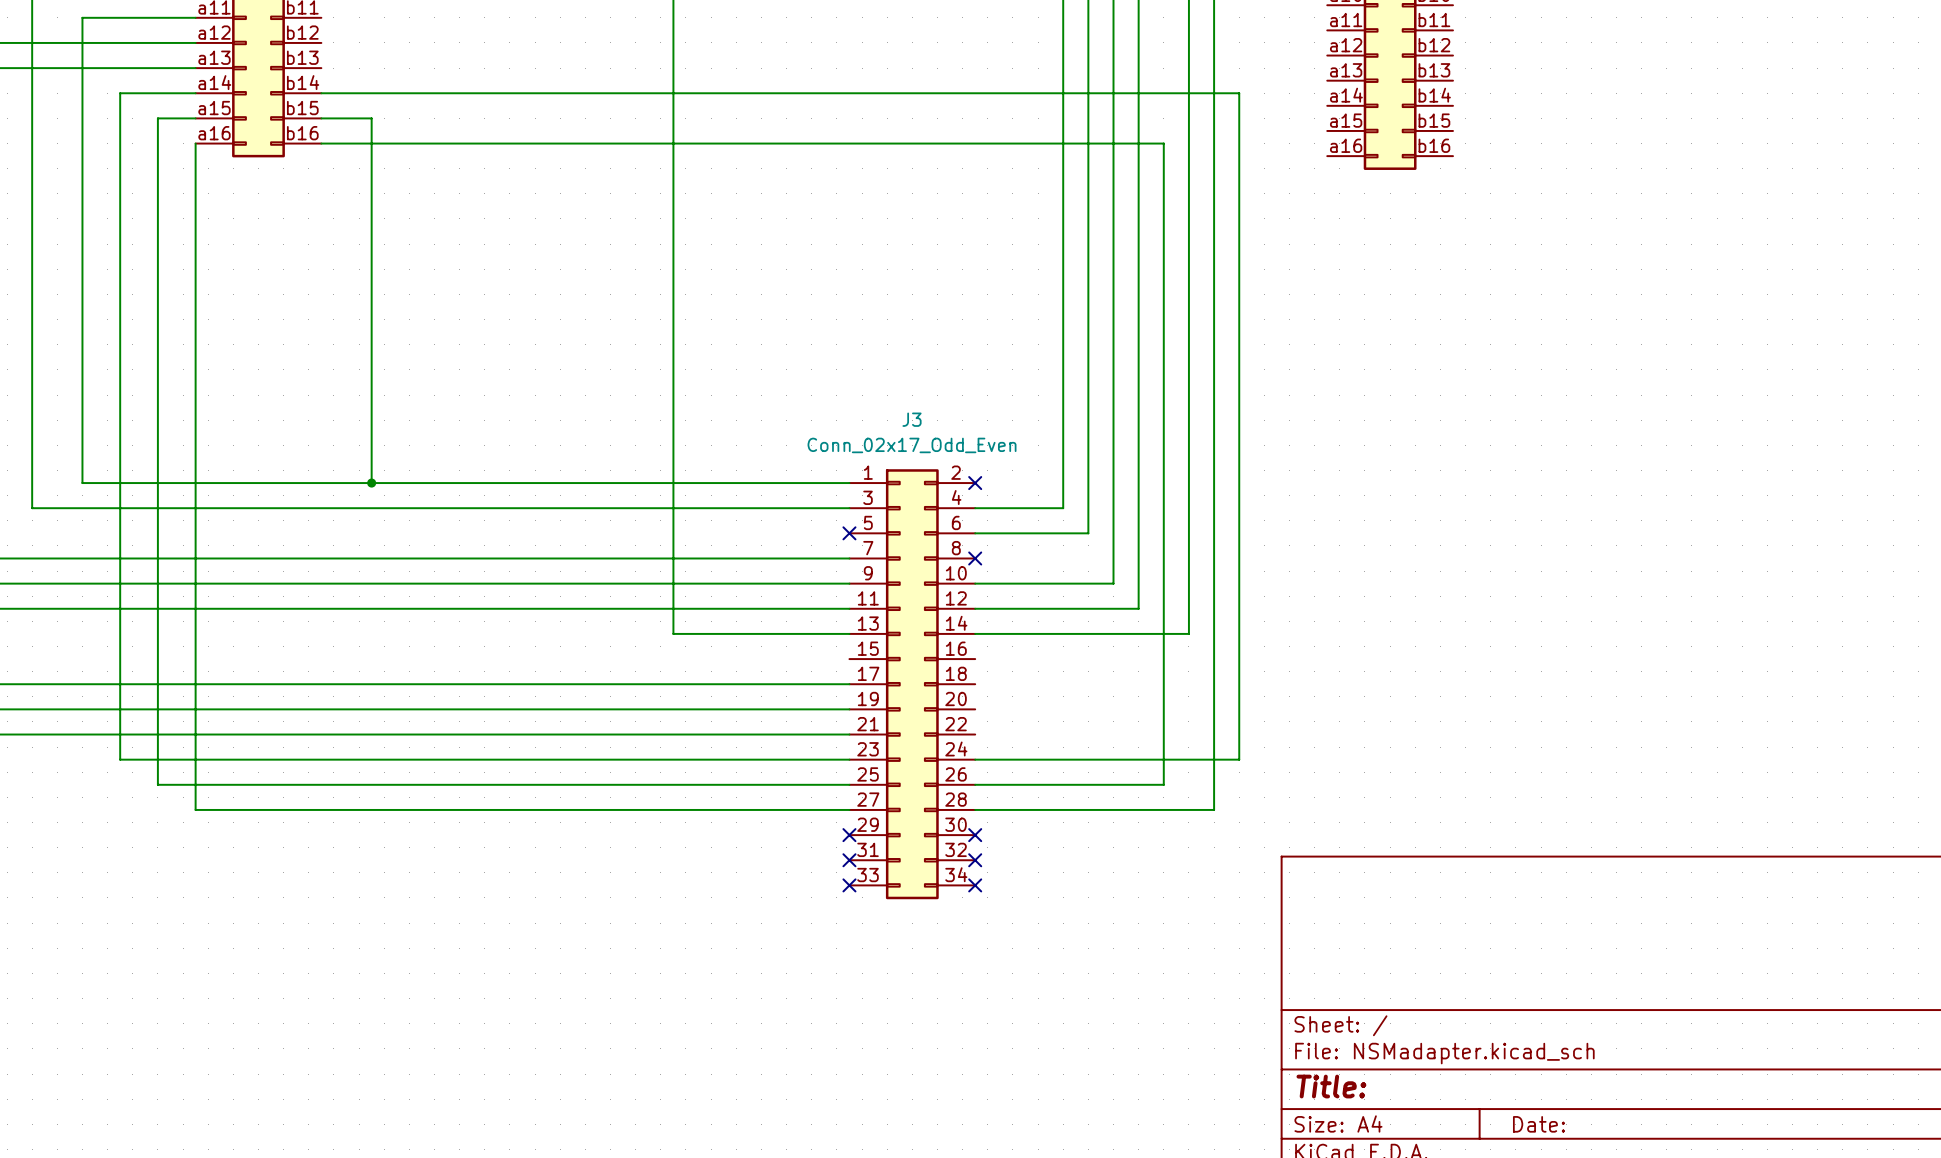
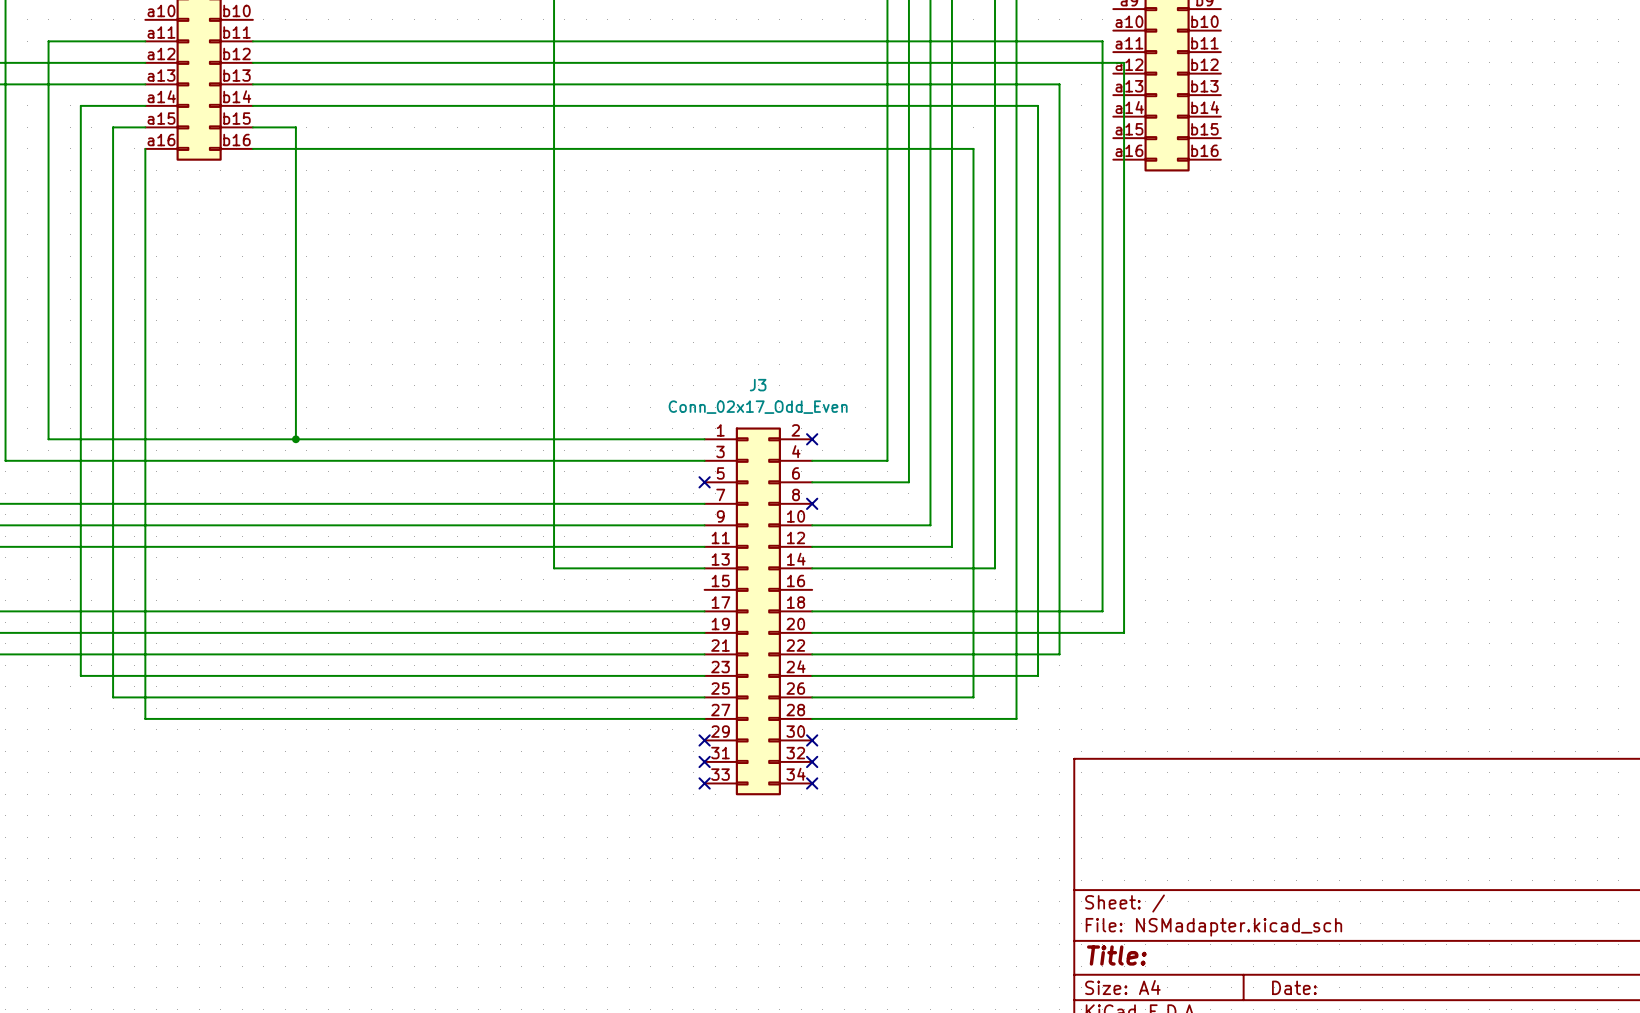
wire: none -> (252, 41) (1102, 41) (1102, 611) (812, 611)
wire: none -> (252, 62) (1124, 62) (1124, 632) (812, 632)
wire: none -> (252, 84) (1059, 84) (1059, 654) (812, 654)

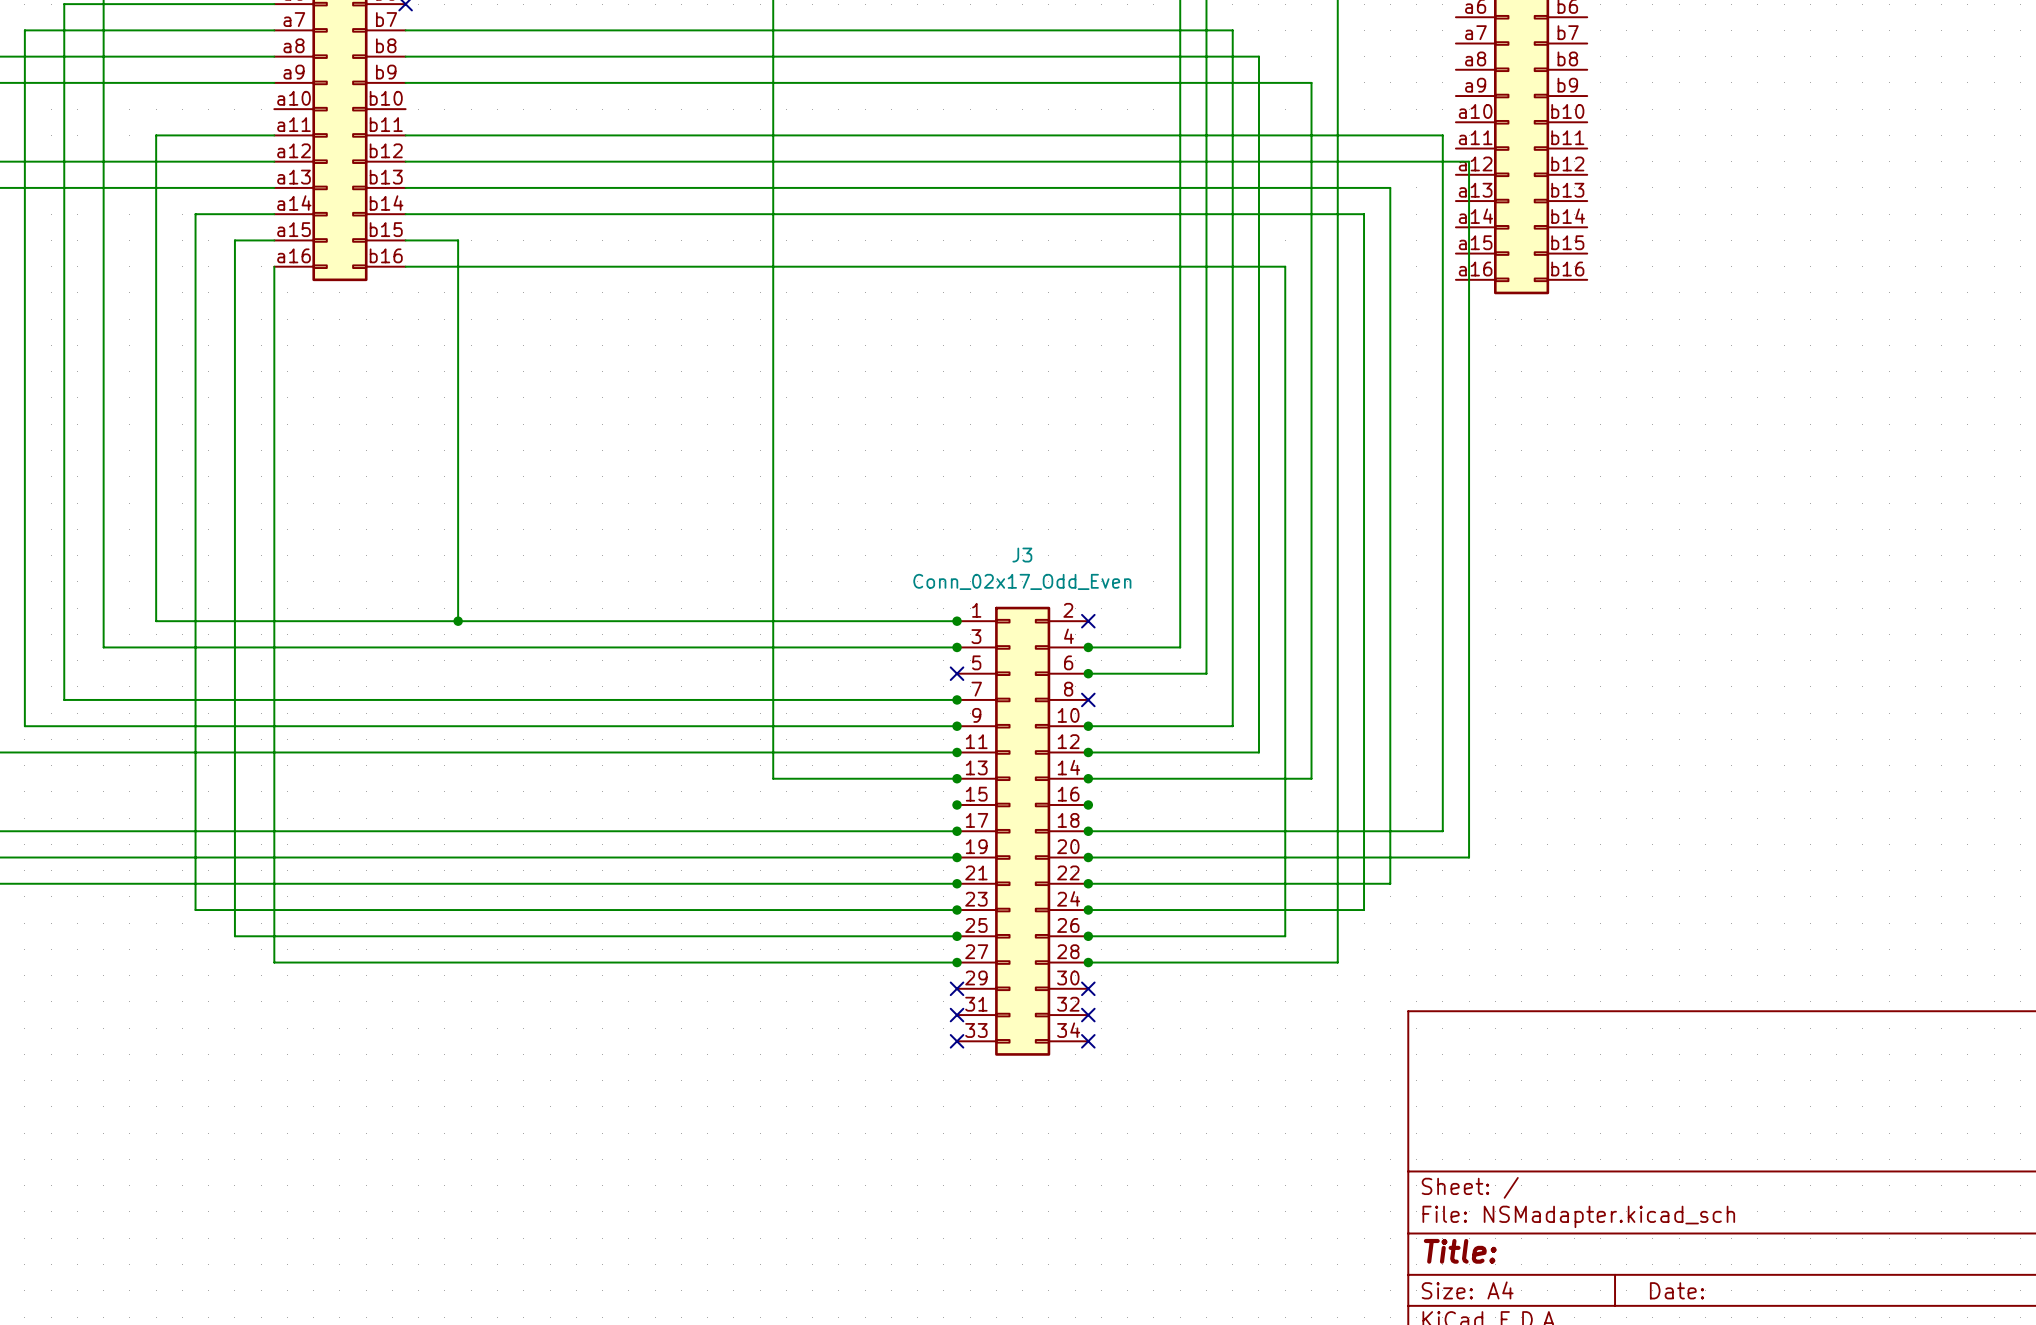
junction: none -> (957, 621)
junction: none -> (957, 647)
junction: none -> (1088, 647)
junction: none -> (1088, 673)
junction: none -> (957, 699)
junction: none -> (957, 726)
junction: none -> (1088, 726)
junction: none -> (957, 752)
junction: none -> (1088, 752)
junction: none -> (957, 778)
junction: none -> (1088, 778)
junction: none -> (957, 804)
junction: none -> (1088, 804)
junction: none -> (957, 831)
junction: none -> (1088, 831)
junction: none -> (957, 857)
junction: none -> (1088, 857)
junction: none -> (957, 883)
junction: none -> (1088, 883)
junction: none -> (957, 910)
junction: none -> (1088, 910)
junction: none -> (957, 936)
junction: none -> (1088, 936)
junction: none -> (957, 962)
junction: none -> (1088, 962)

